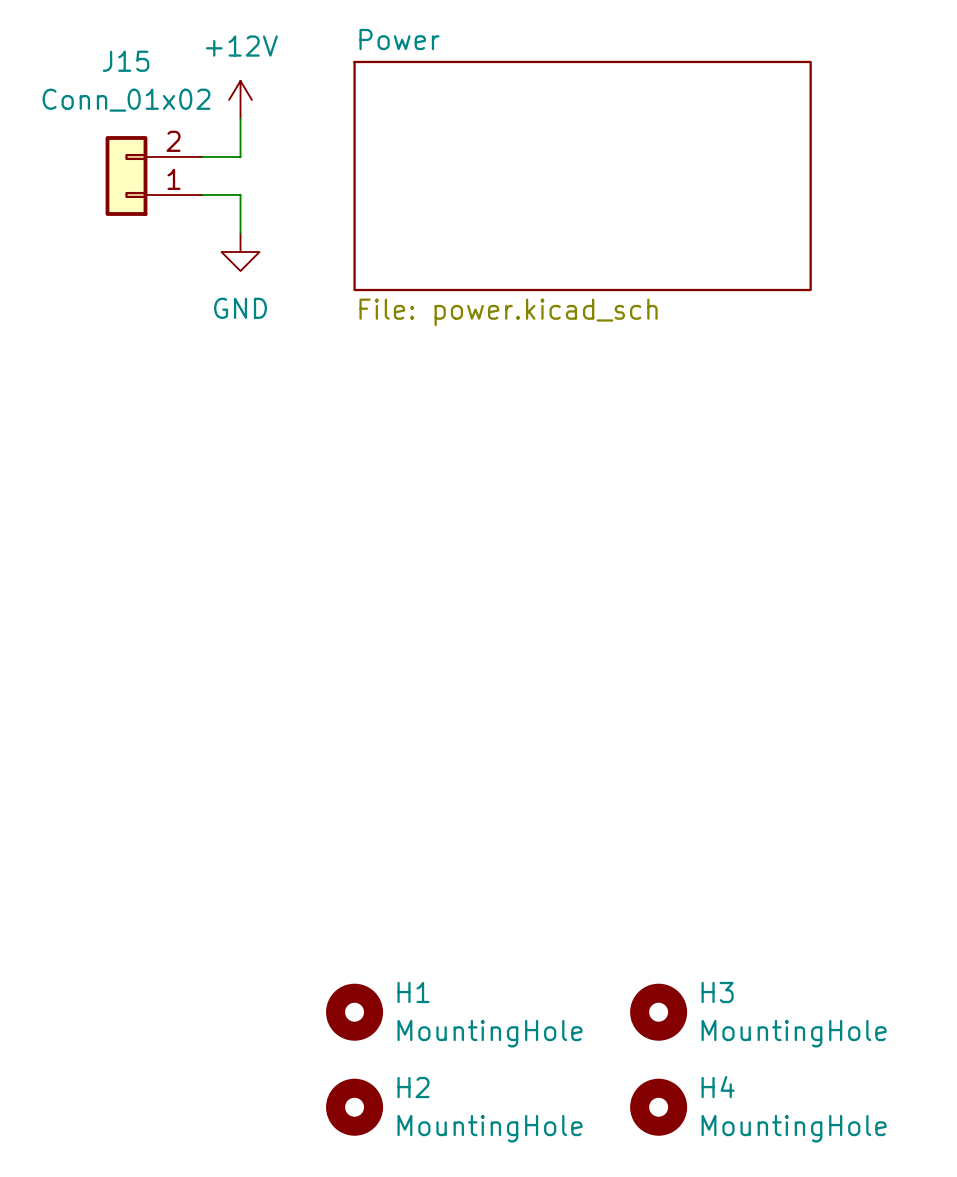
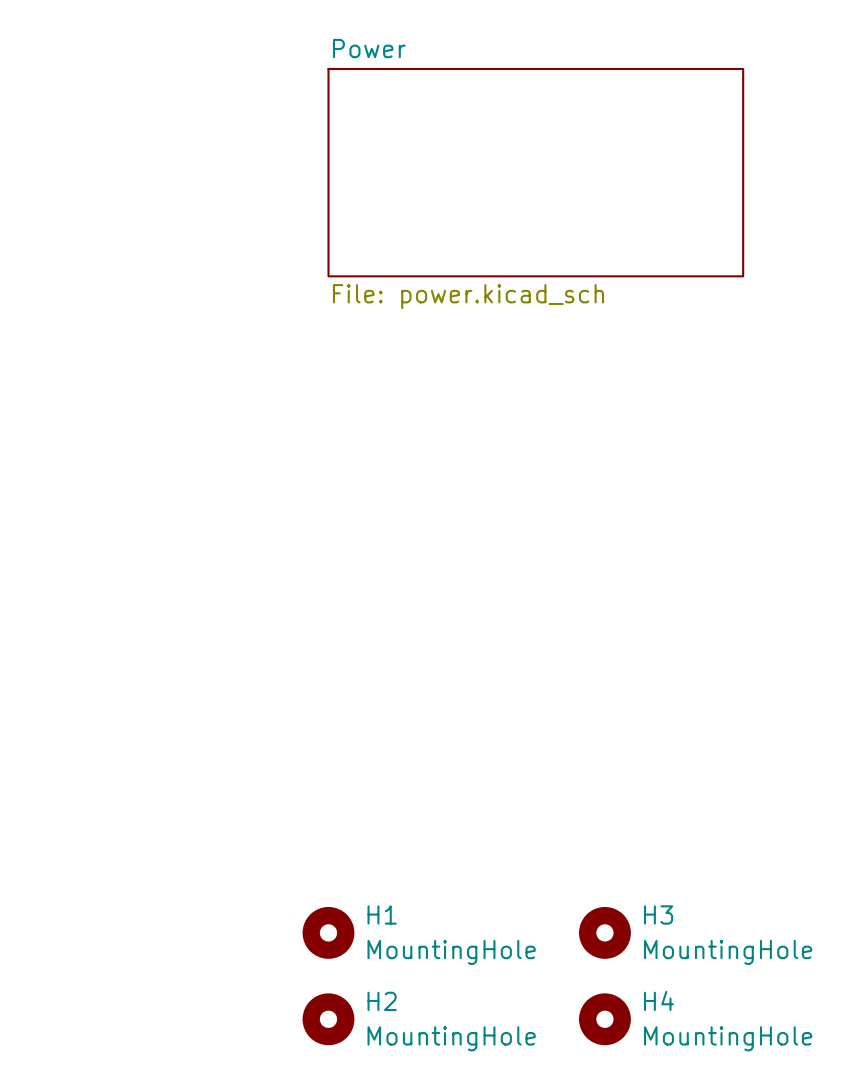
power symbol: +12V (240, 99) -> none
wire: (240, 118) (240, 156) (202, 156) -> none
J15: Conn_01x02 (154, 175) -> none
wire: (202, 194) (240, 194) (240, 233) -> none
power symbol: GND (240, 252) -> none

